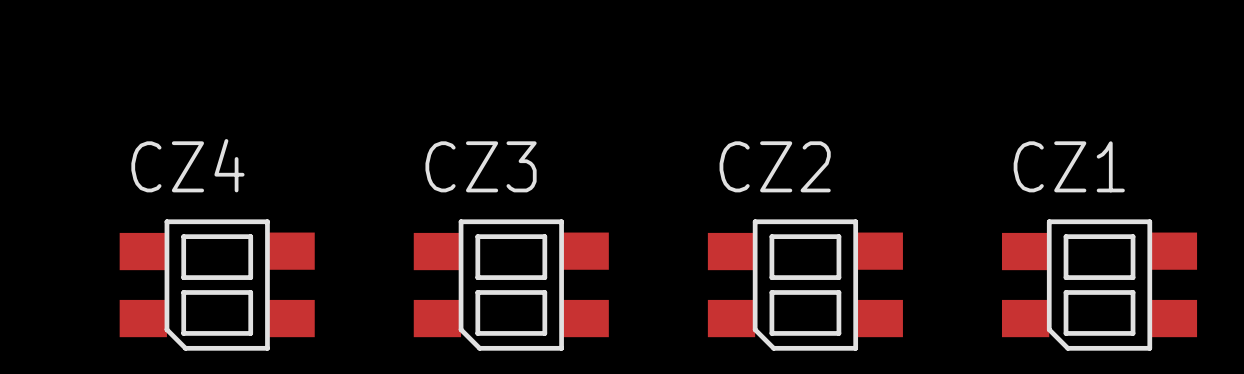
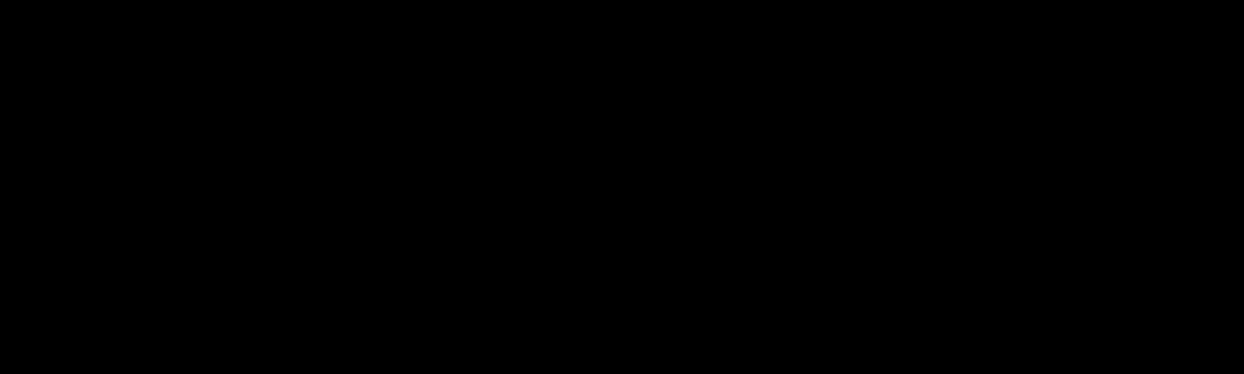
CZ4: (217, 285) -> none
CZ3: (511, 285) -> none
CZ2: (805, 285) -> none
CZ1: (1099, 285) -> none

